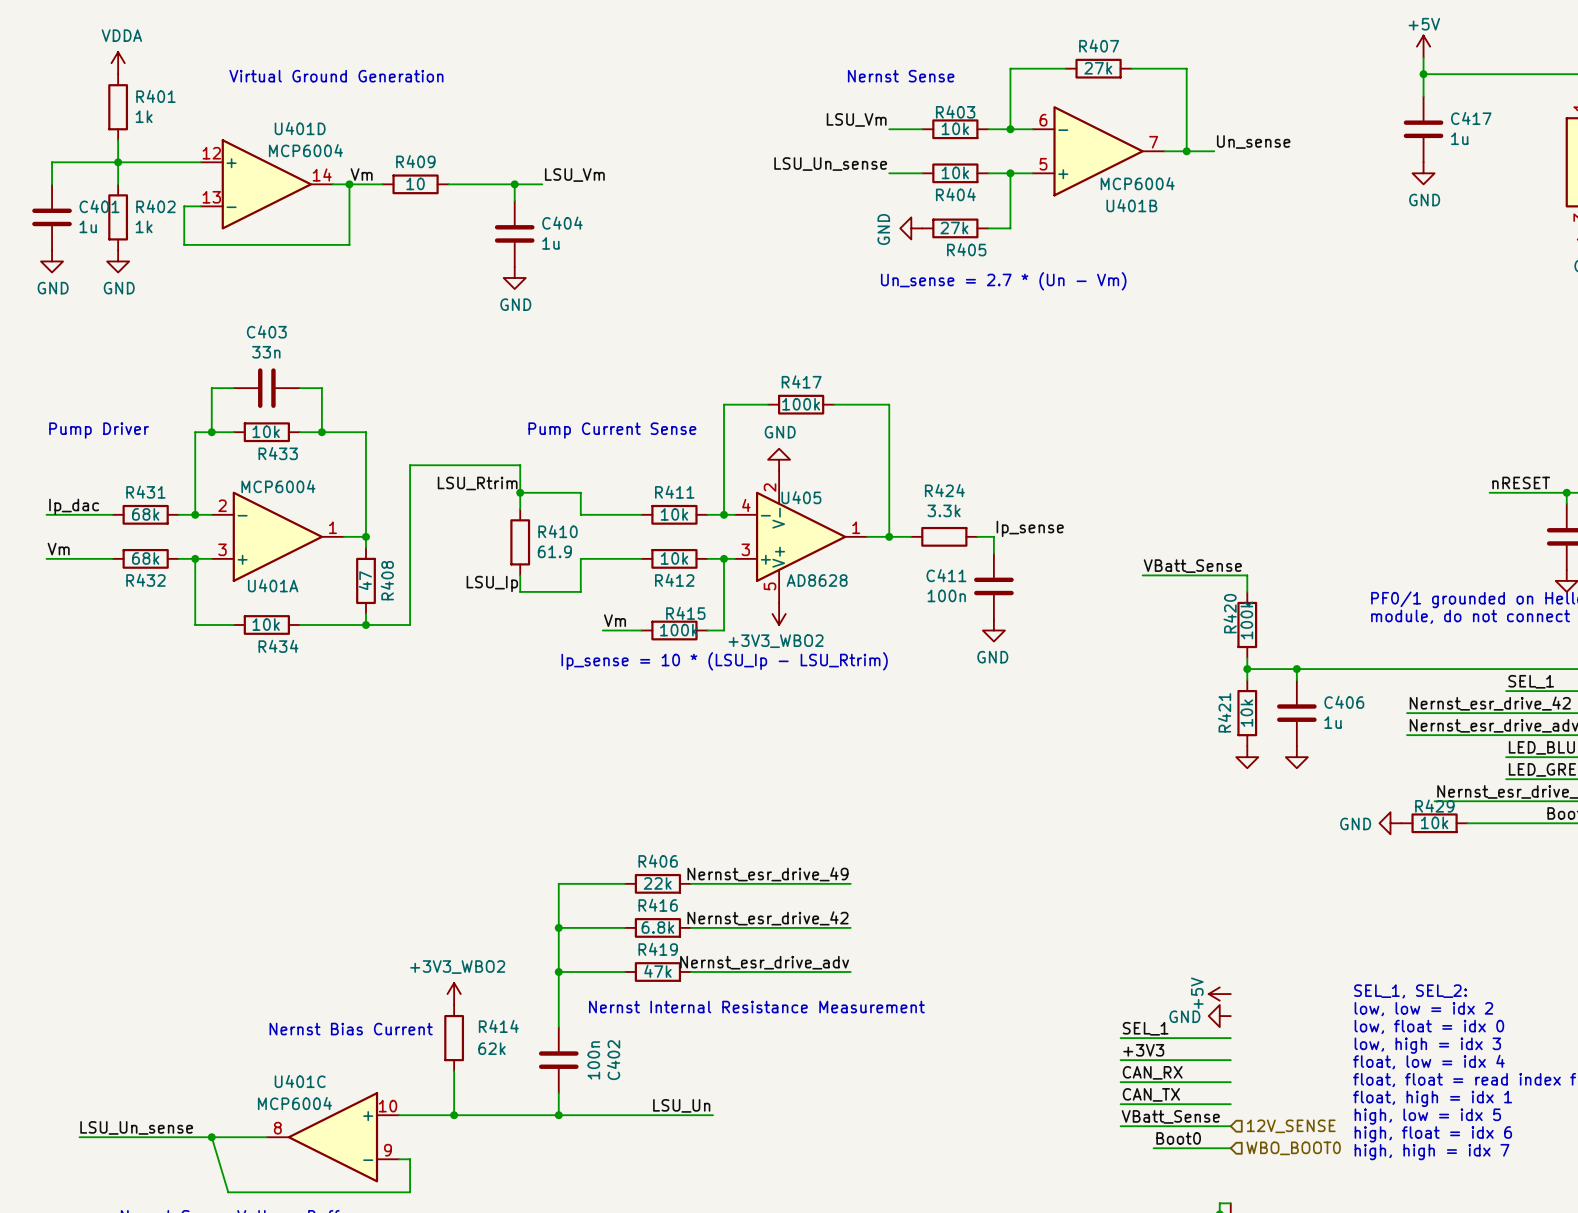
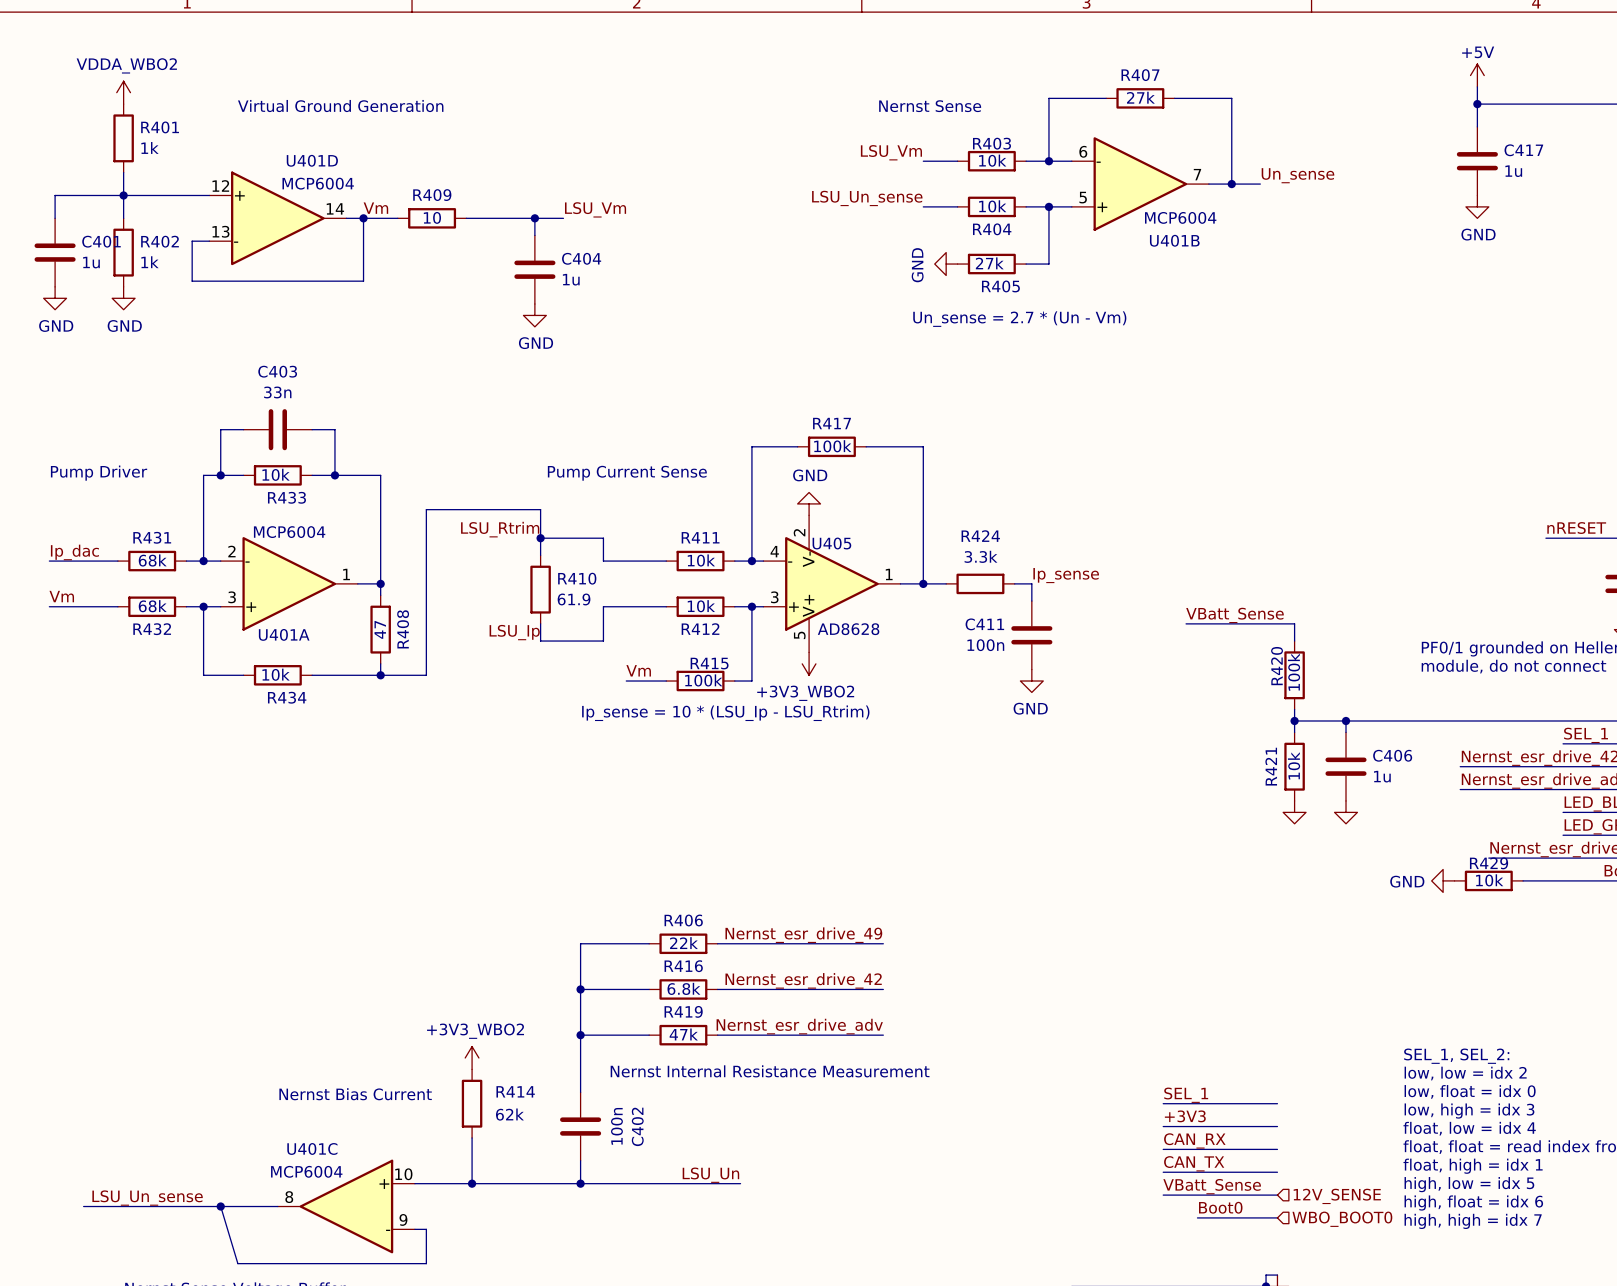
power symbol: VDDA (118, 63) -> VDDA_WBO2 (123, 92)
power symbol: +5V (1219, 994) -> none
power symbol: GND (1219, 1016) -> none

